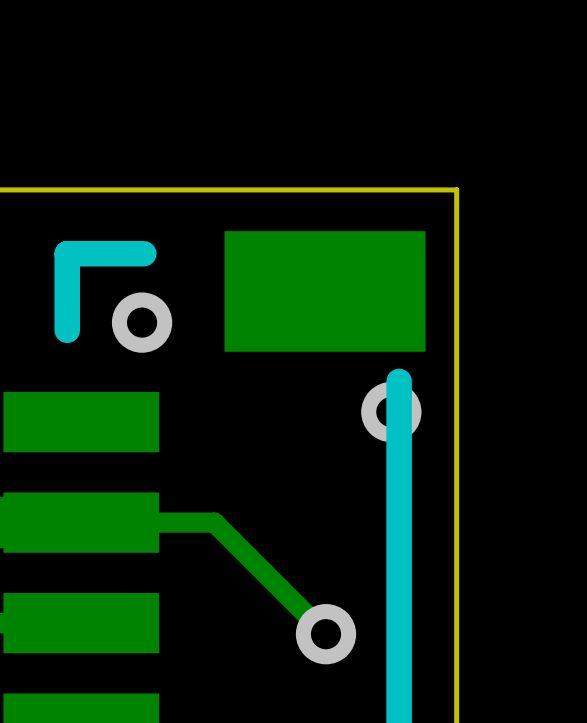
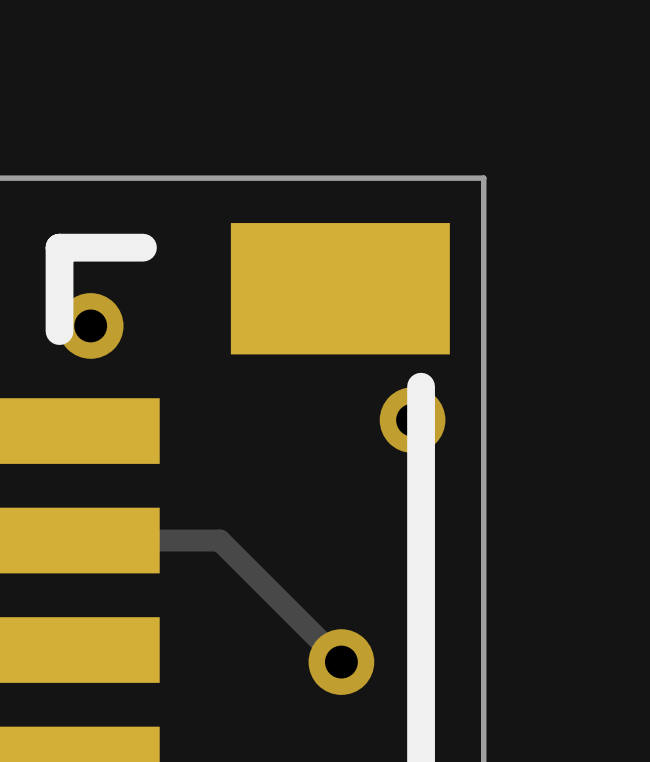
via position: (142, 322) -> (90, 325)

